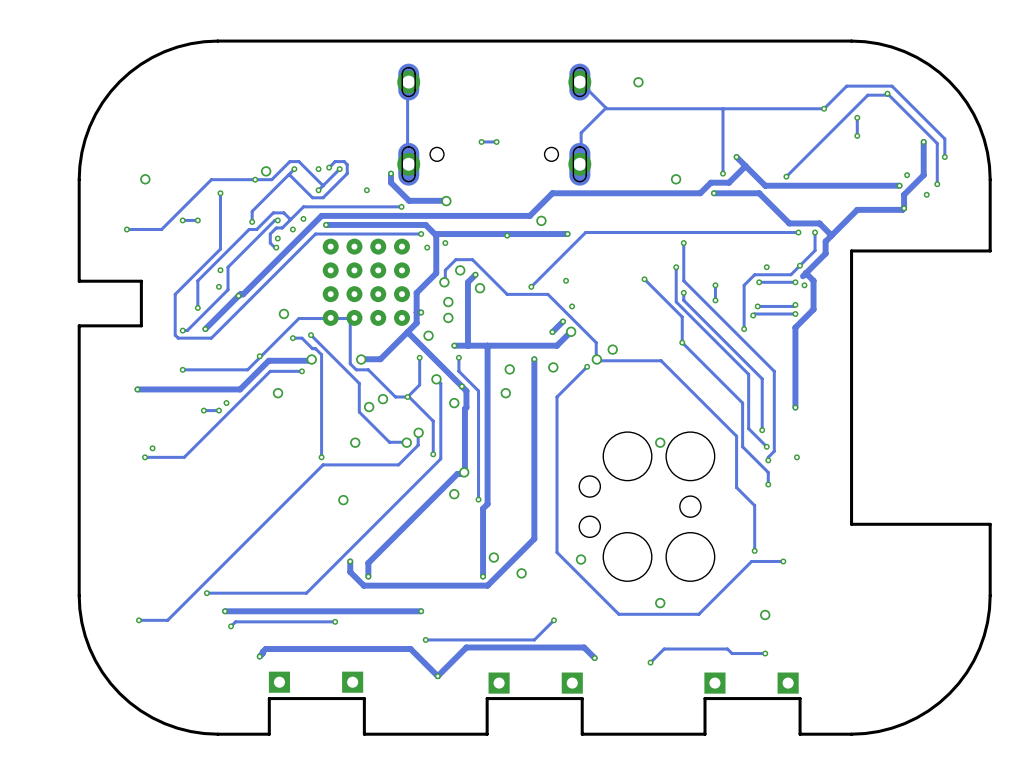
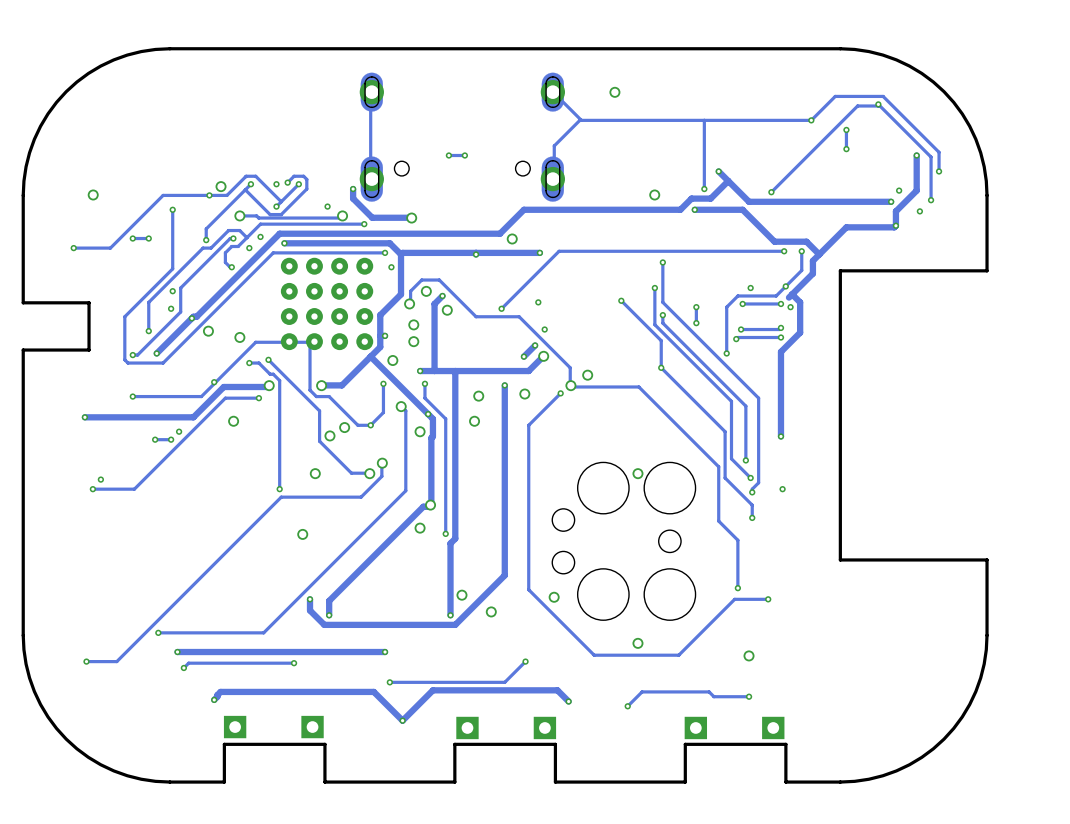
via: none -> (239, 215)
track: none -> (342, 215) (340, 218) (258, 218) (256, 215) (239, 215)
via: none -> (342, 215)
via: (277, 238) -> none
via: (445, 243) -> none
via: none -> (208, 331)
track: (409, 396) (433, 421) (433, 454) -> none
via: (433, 454) -> none

